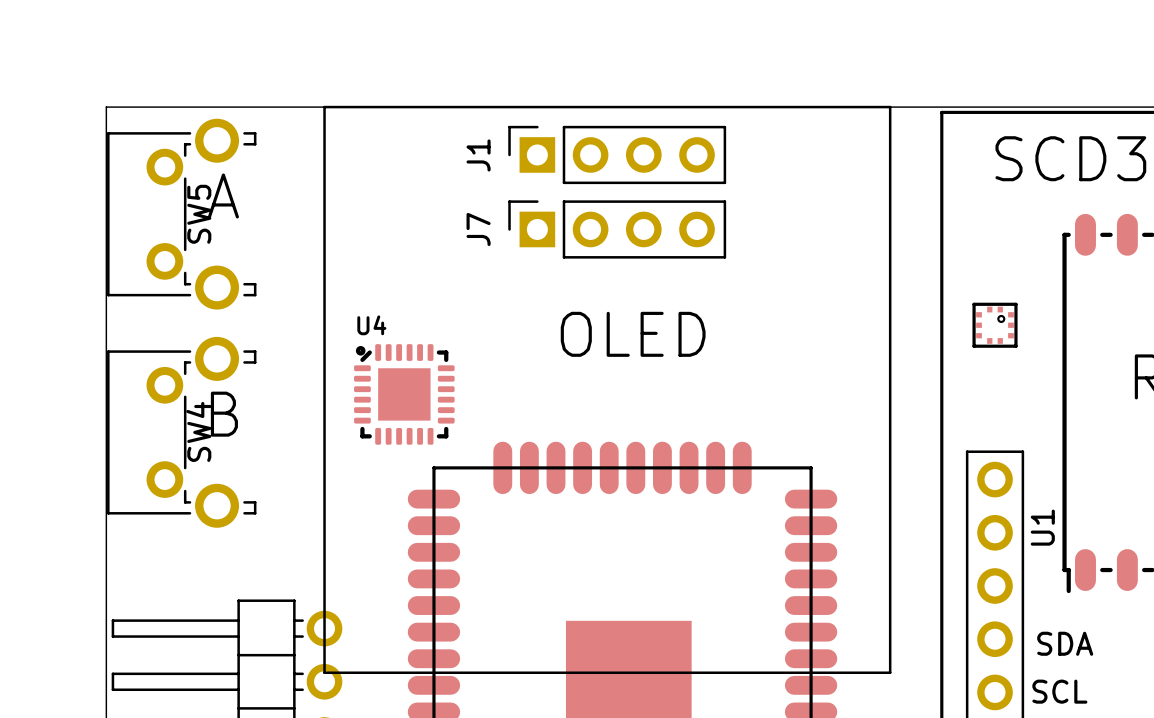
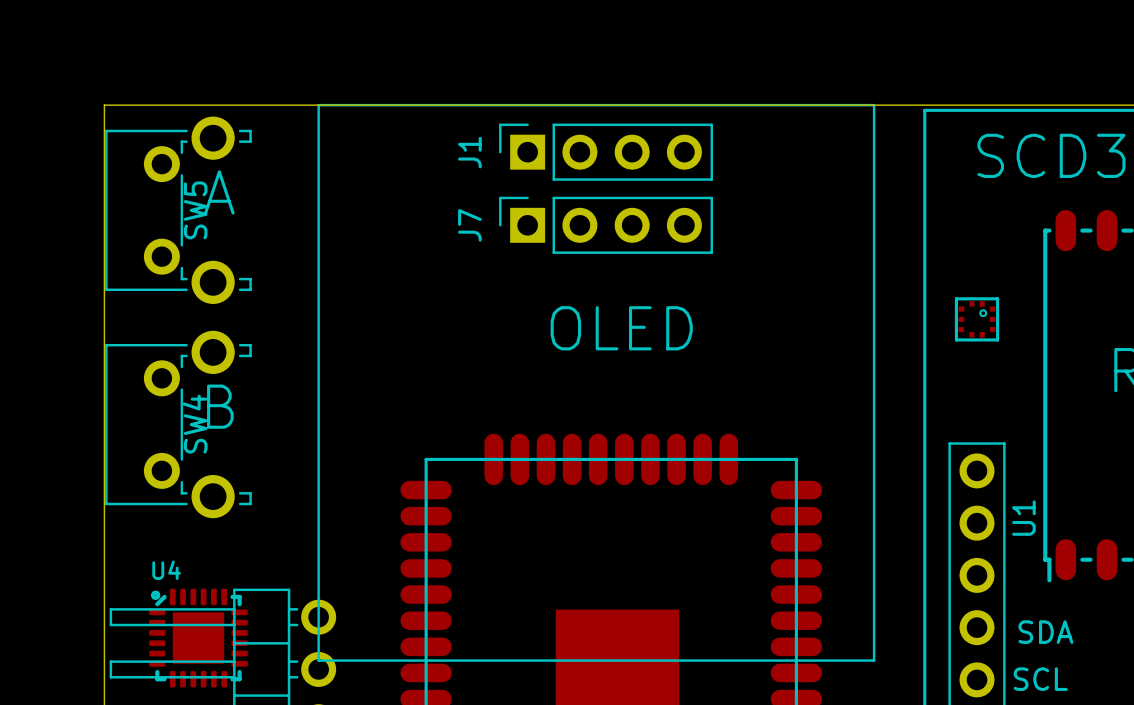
U4 position: (404, 394) -> (198, 638)

